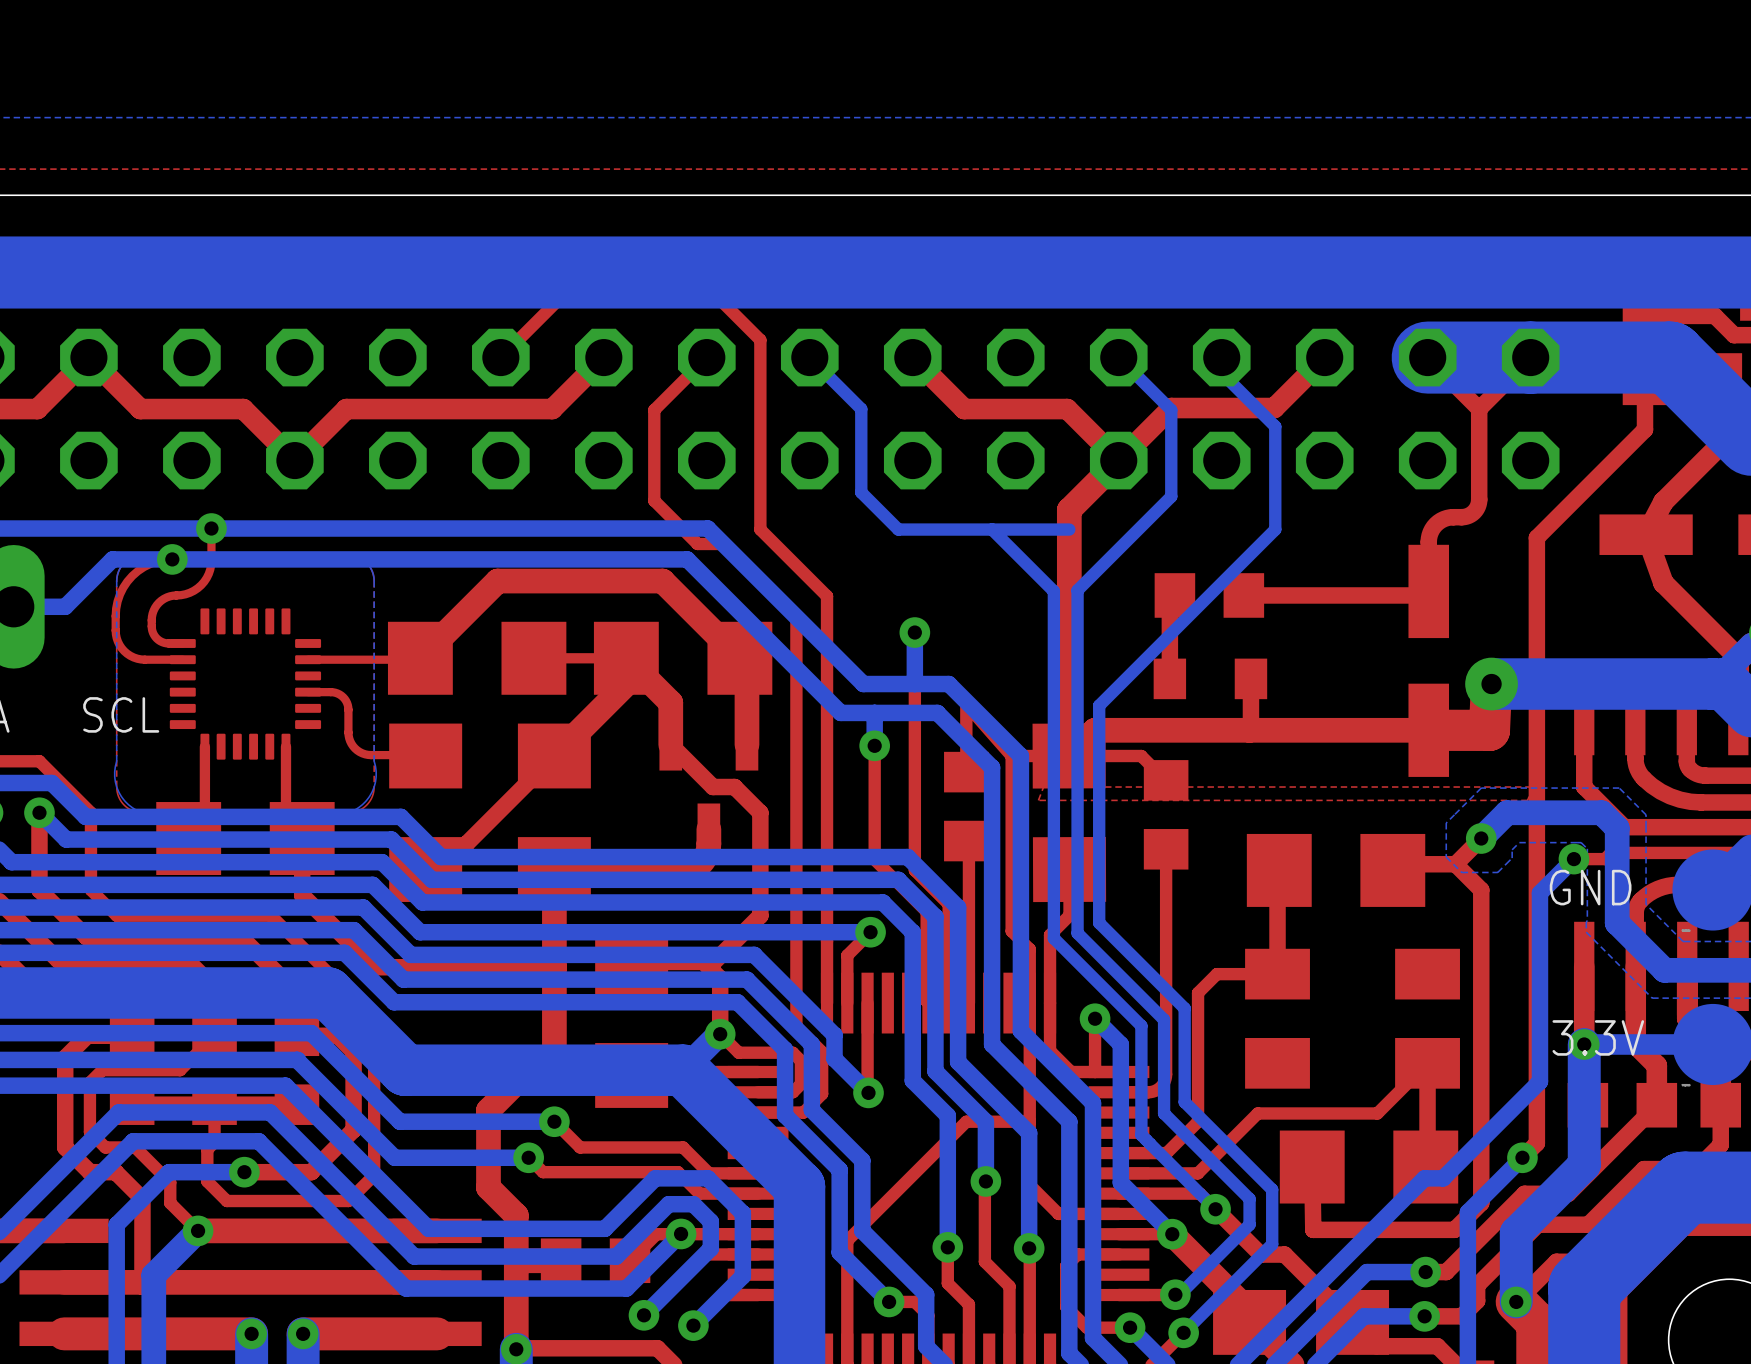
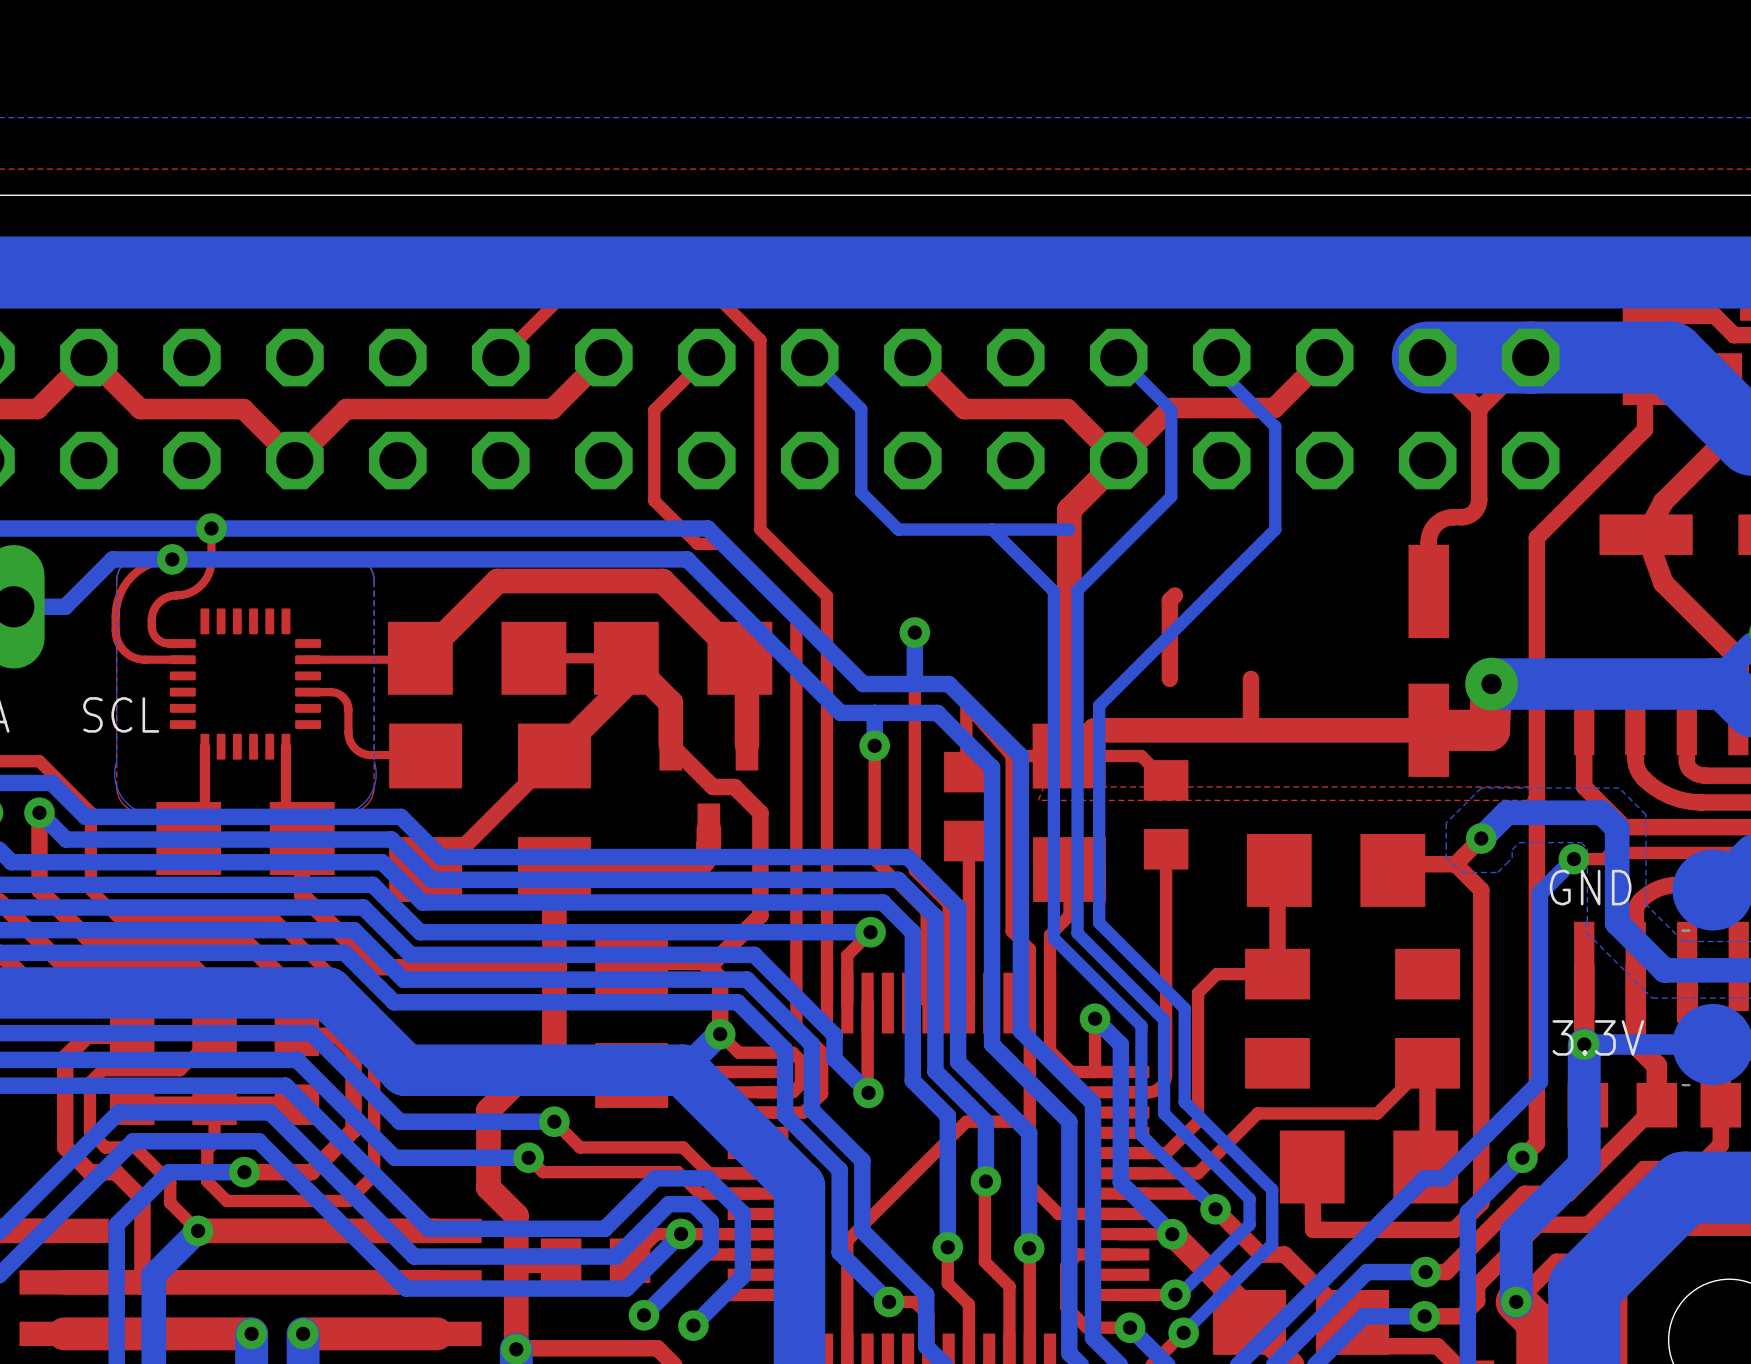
top track: (1428, 591) (1424, 595) (1243, 595) -> none
part: (1209, 595) -> none
part: (1210, 678) -> none

